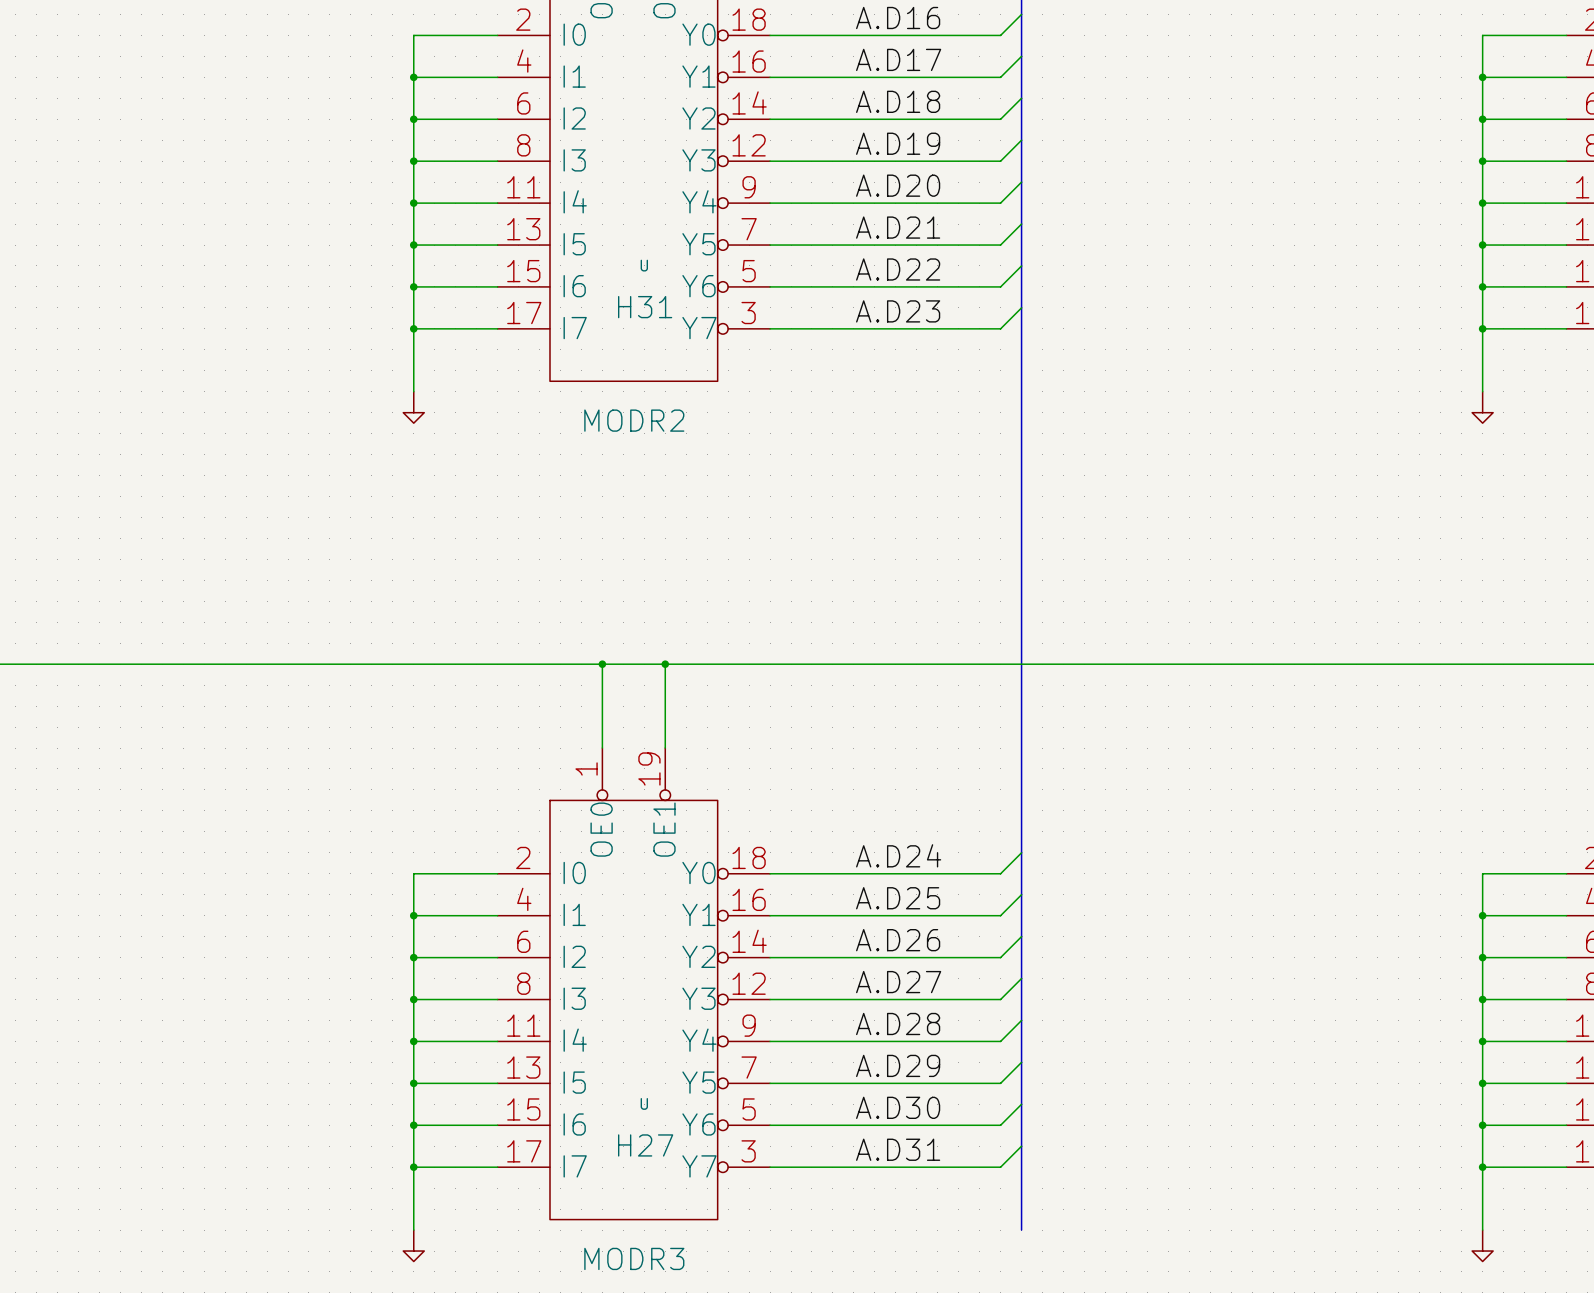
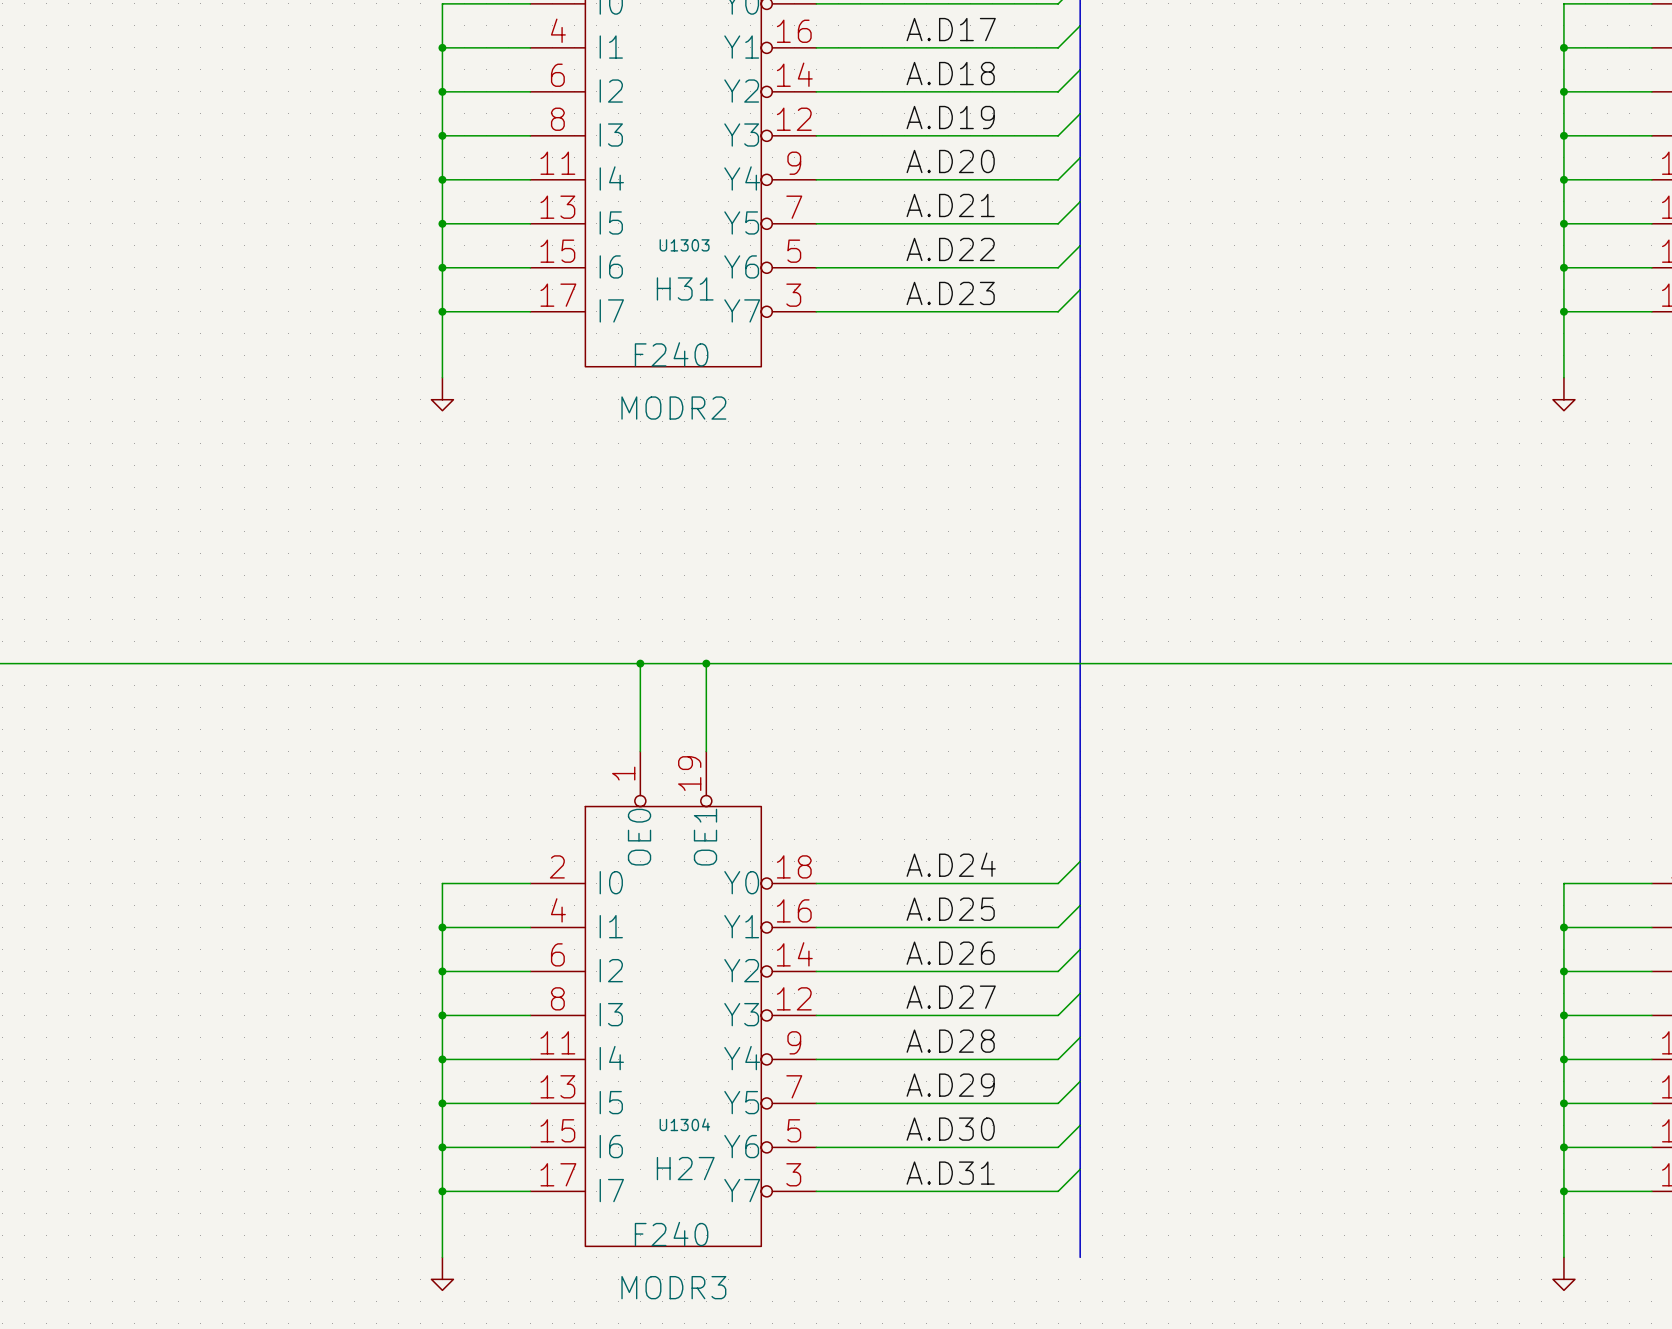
U name: U (644, 265) -> U1303 (684, 245)
U value: none -> F240 (671, 354)
U name: U (644, 1103) -> U1304 (684, 1124)
U value: none -> F240 (671, 1234)

